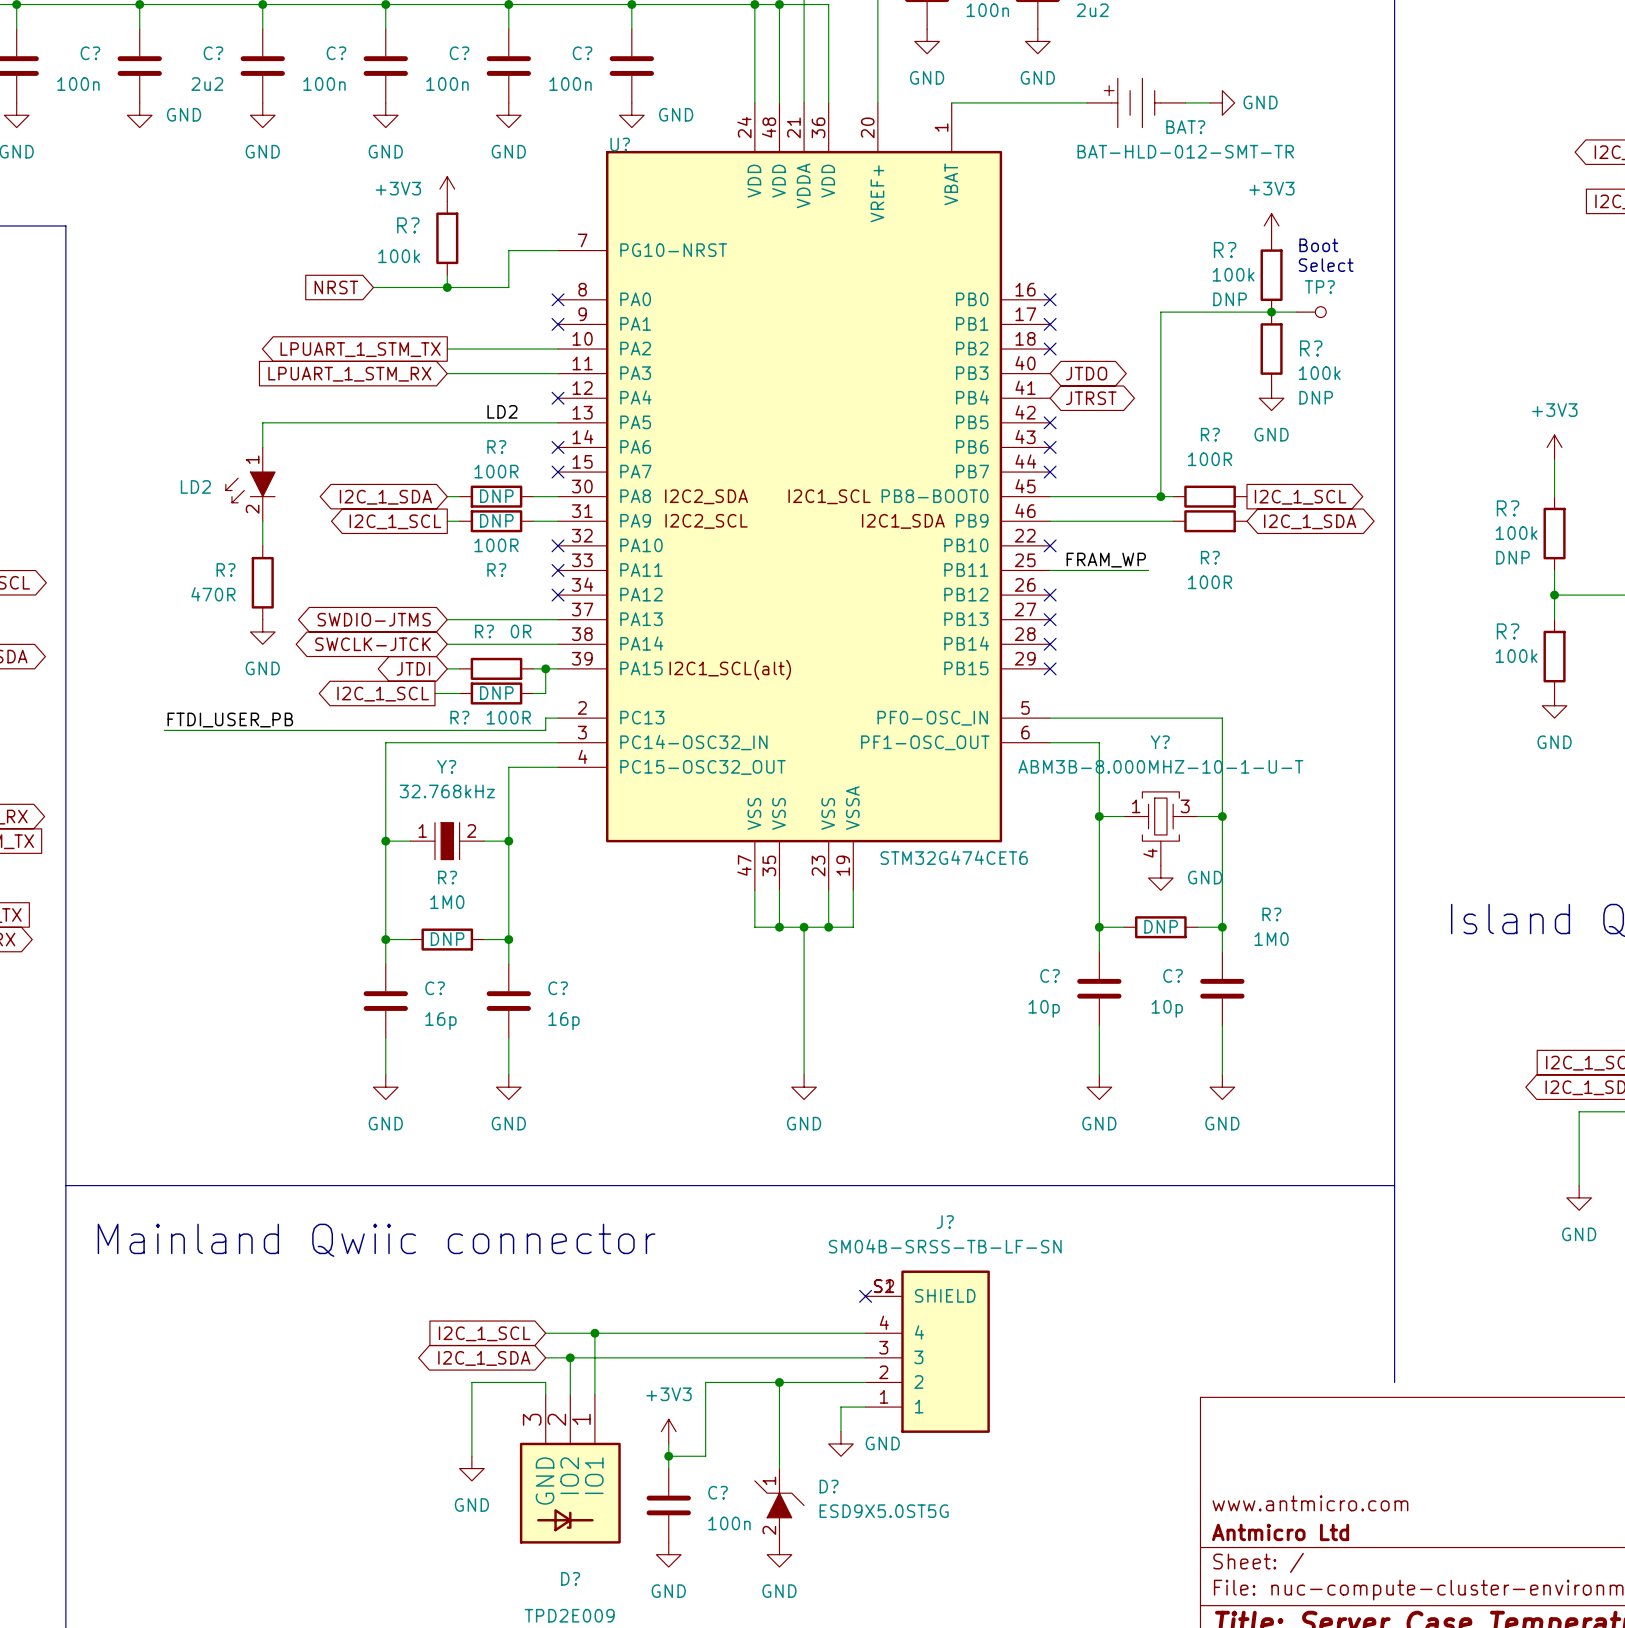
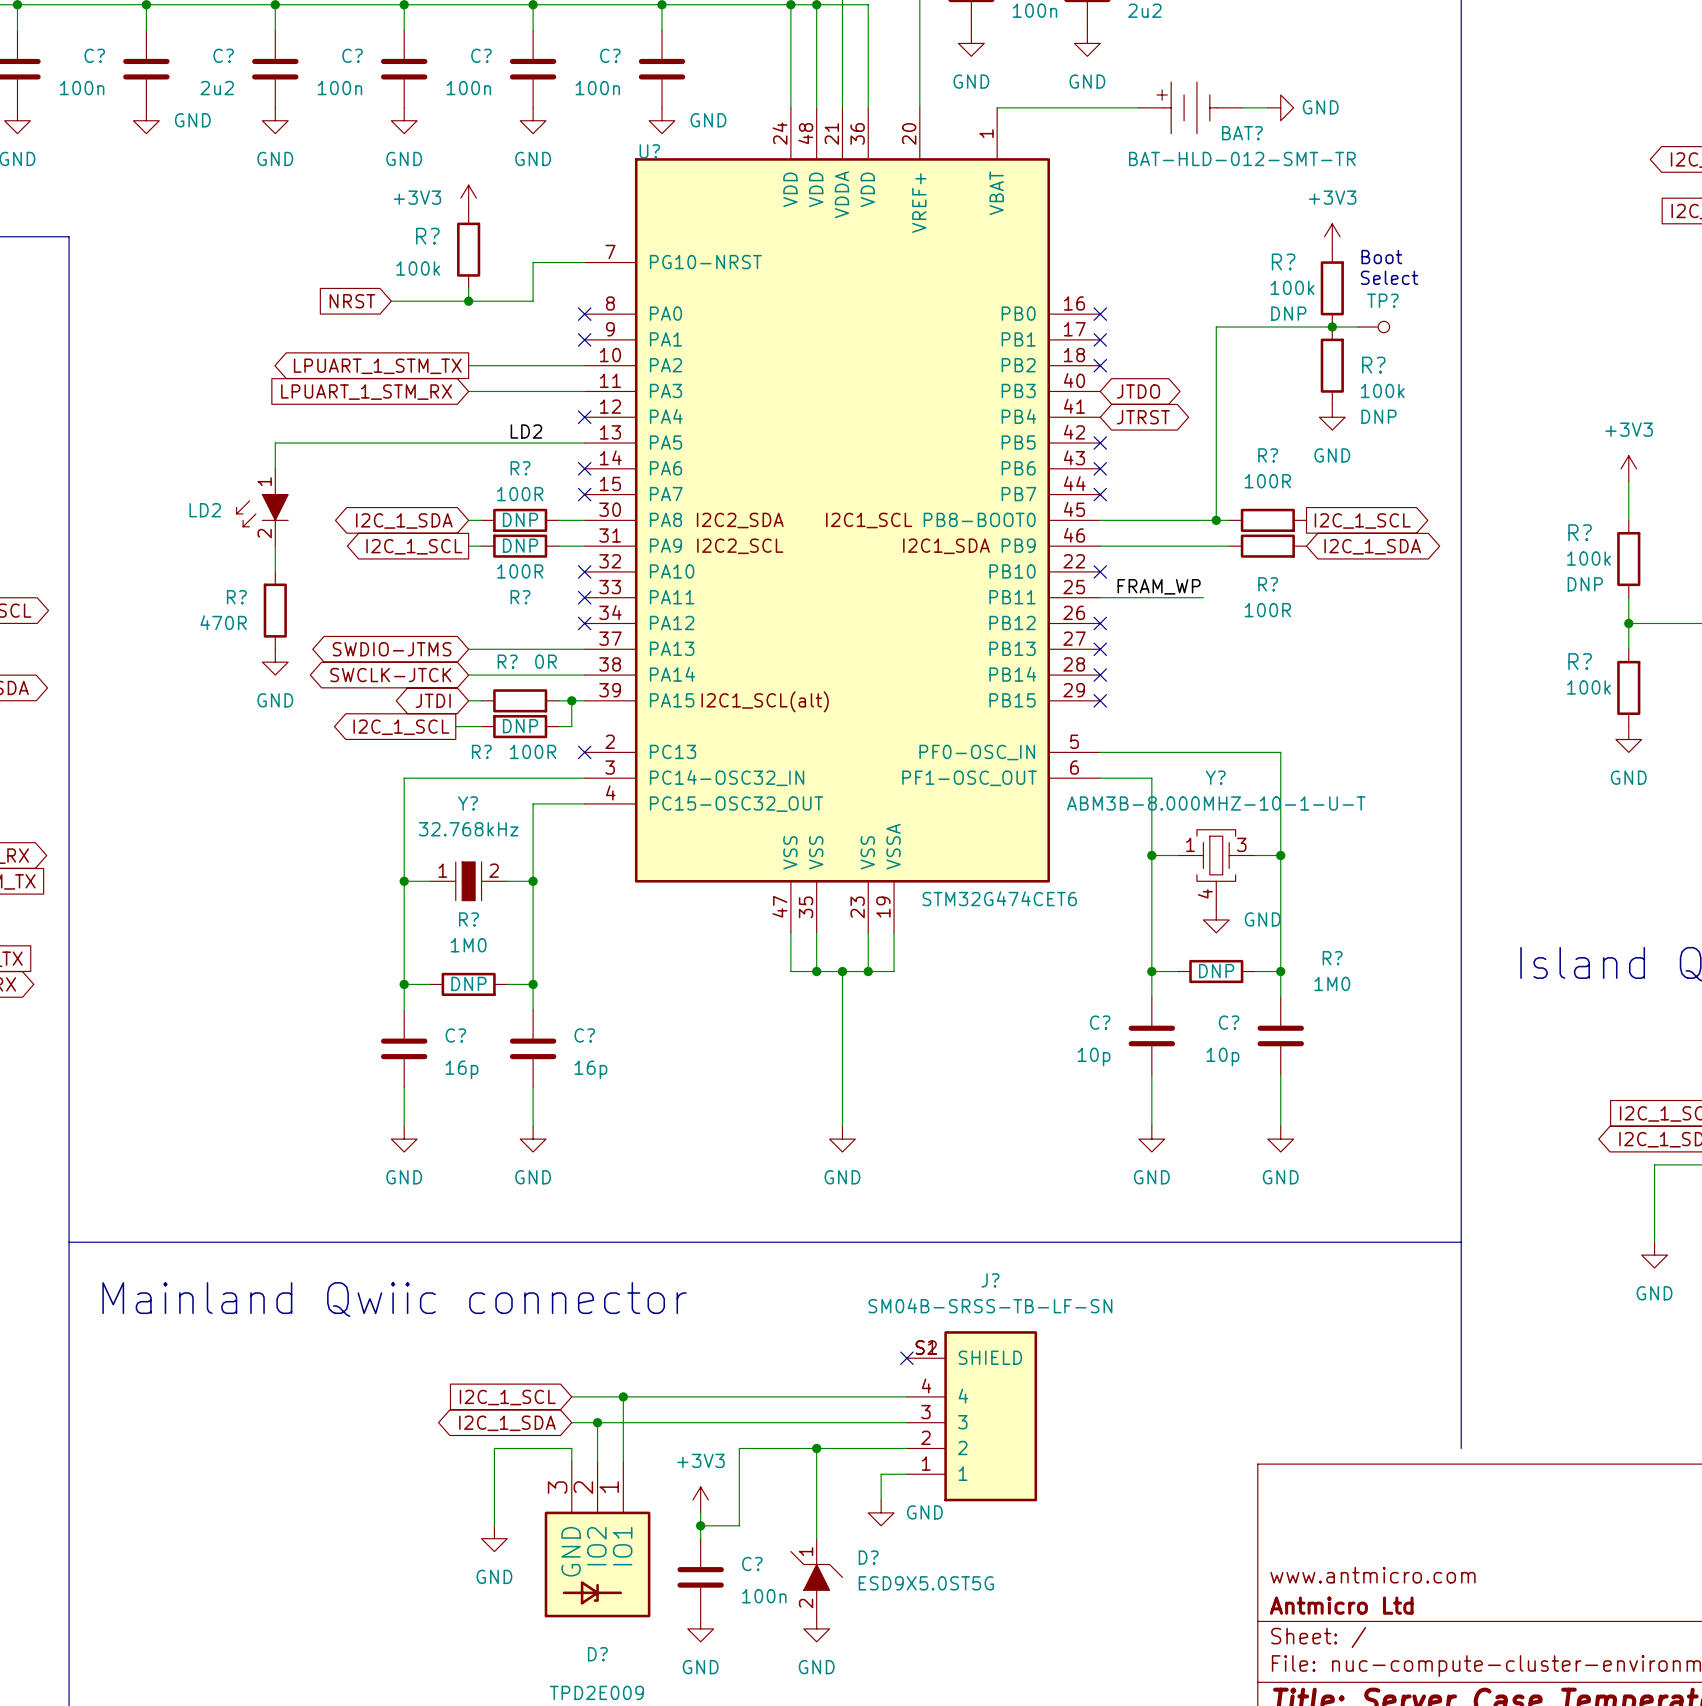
wire: (558, 718) (545, 718) (545, 730) (164, 730) -> none
no-connect mark: none -> (584, 752)
label: FTDI_USER_PB (230, 720) -> none

